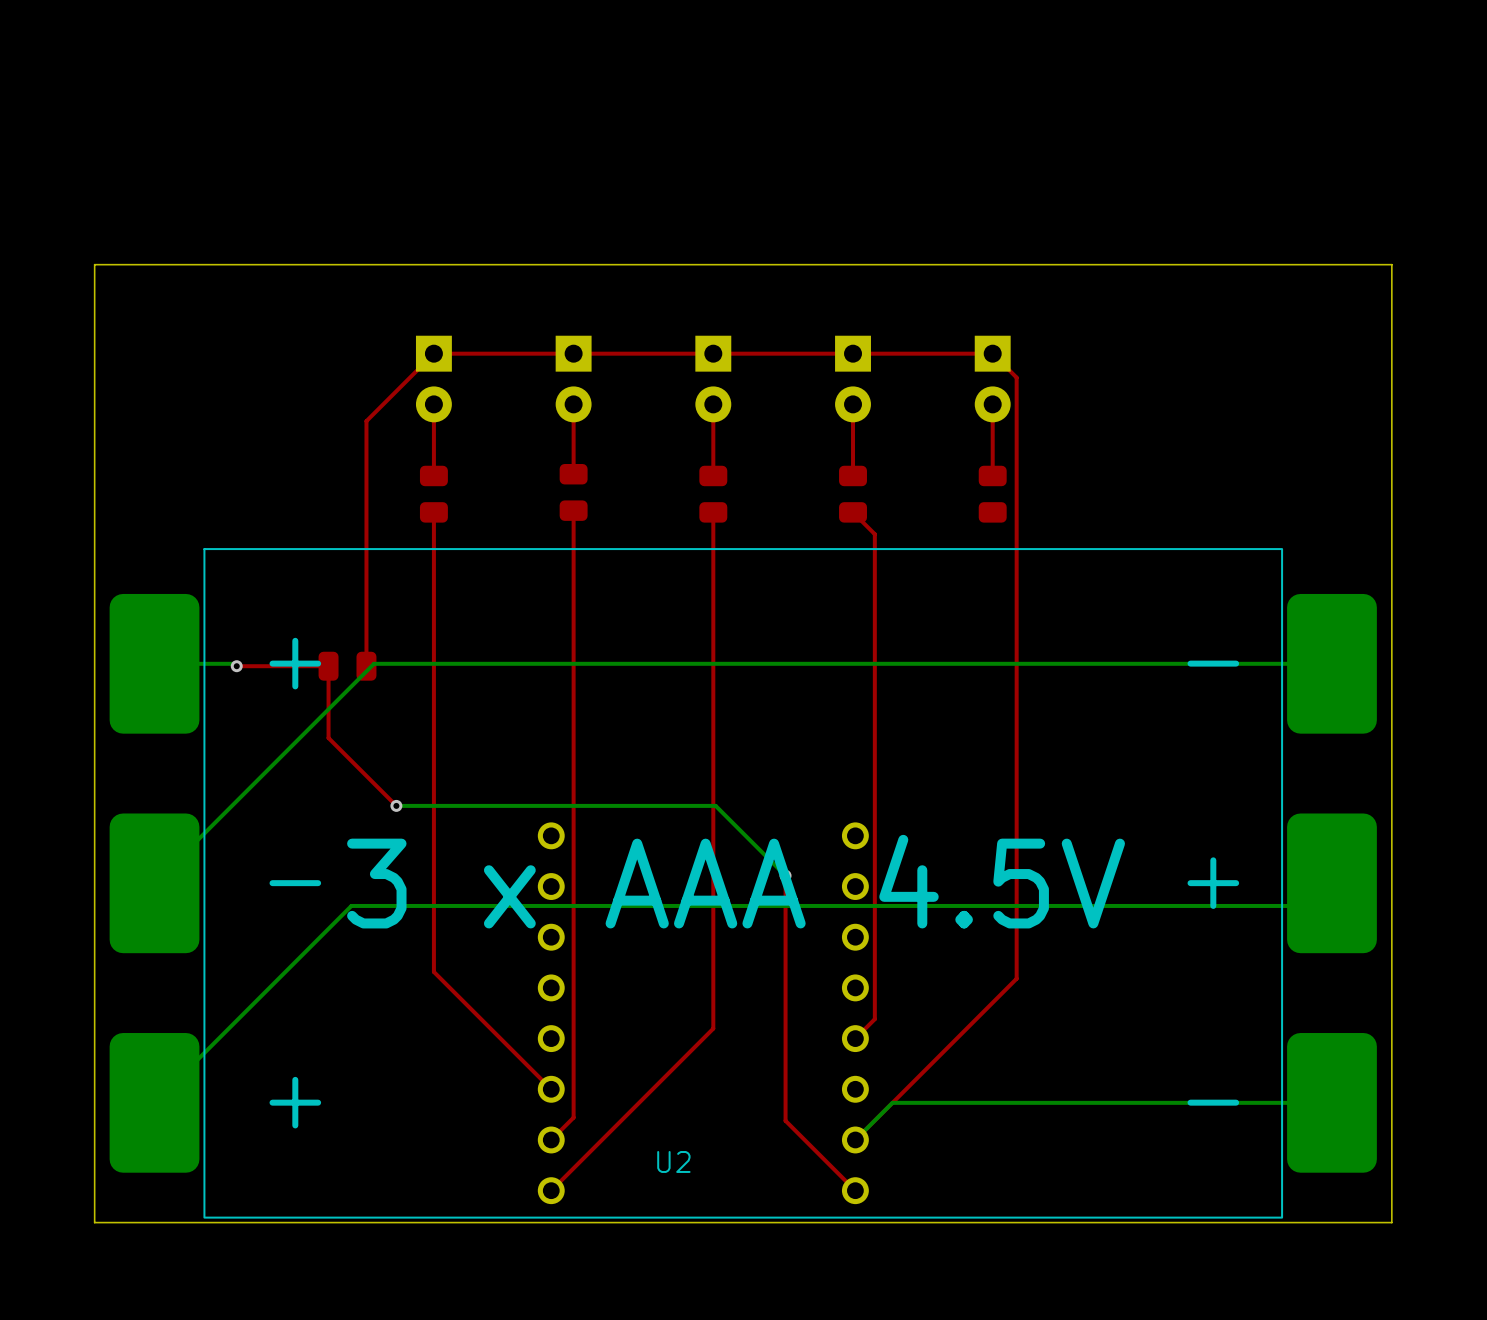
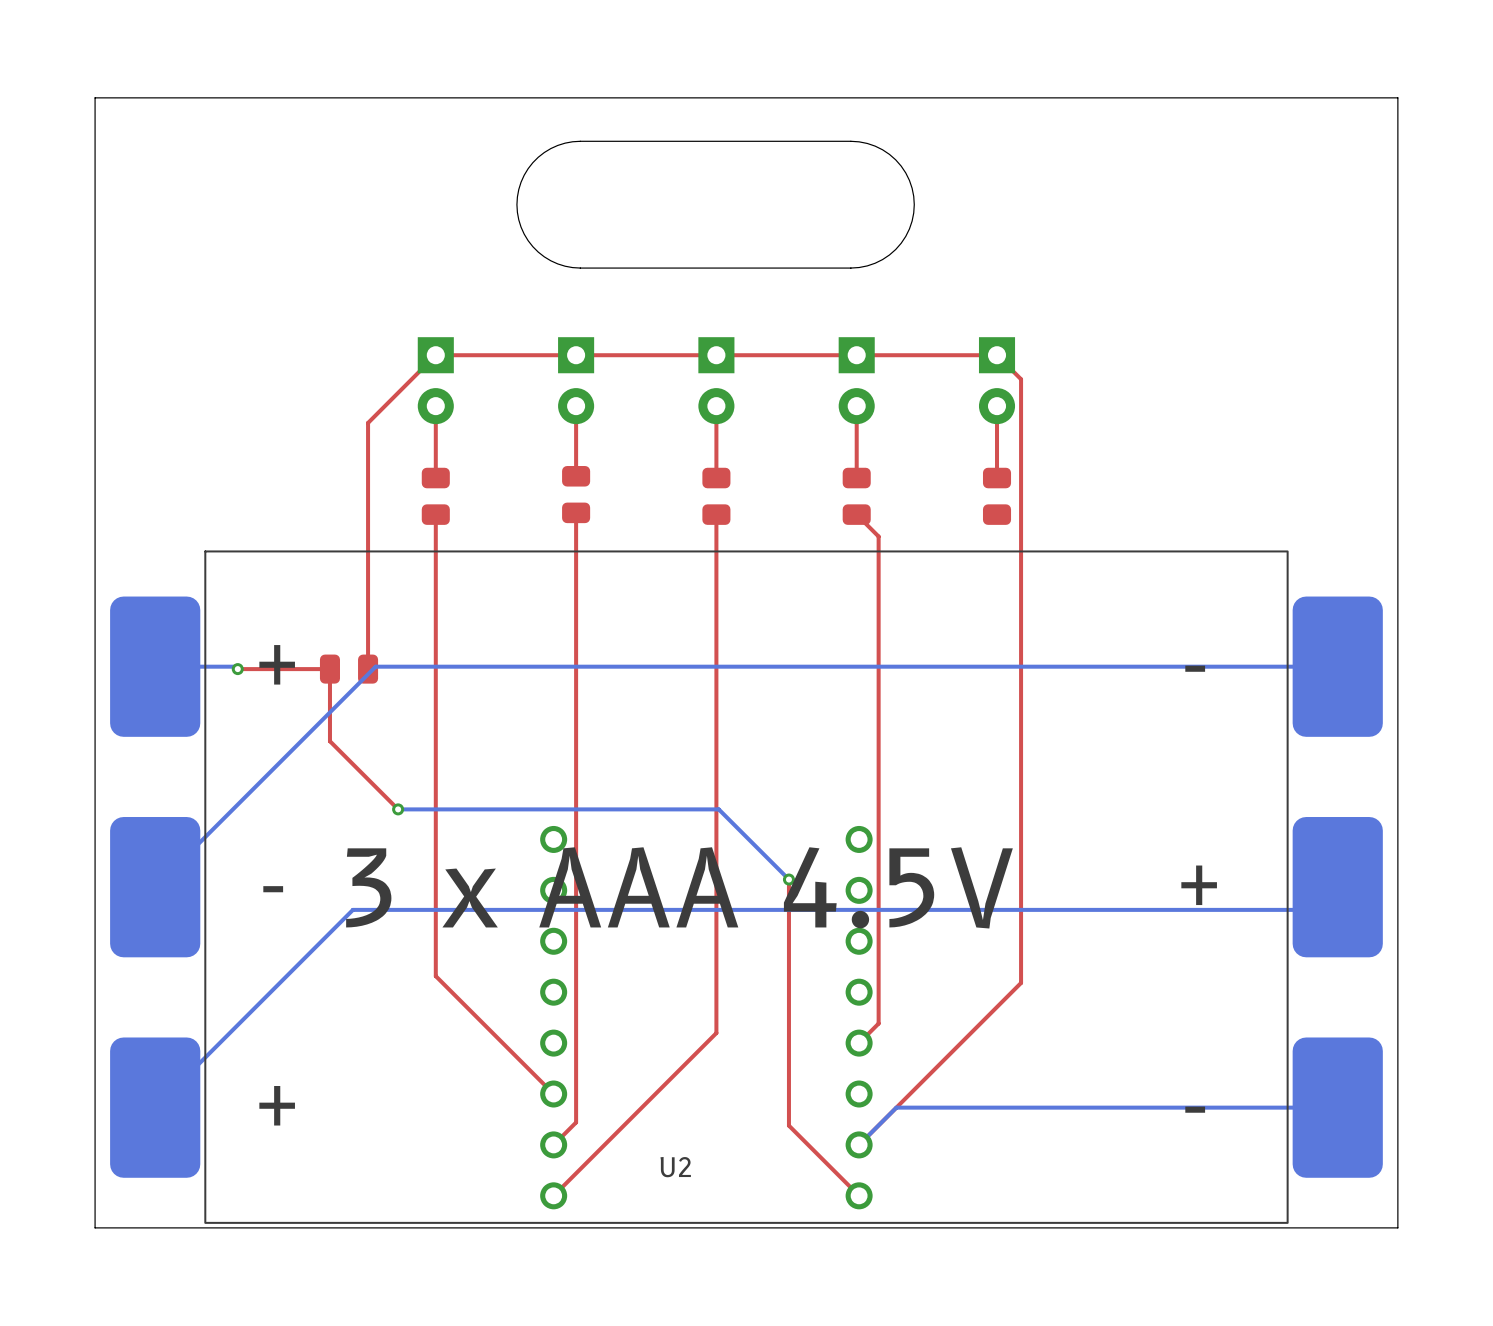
board edge: none -> (850, 141) (580, 141) (565, 143) (544, 152) (528, 168) (518, 189) (516, 204) (518, 219) (528, 240) (538, 252) (557, 263) (572, 267) (850, 268) (867, 265) (882, 259) (901, 243) (912, 221) (913, 196) (905, 172) (889, 154) (867, 143) (850, 141)
board edge: (1391, 264) (94, 264) -> (1397, 265) (1397, 97) (95, 97) (95, 265)

